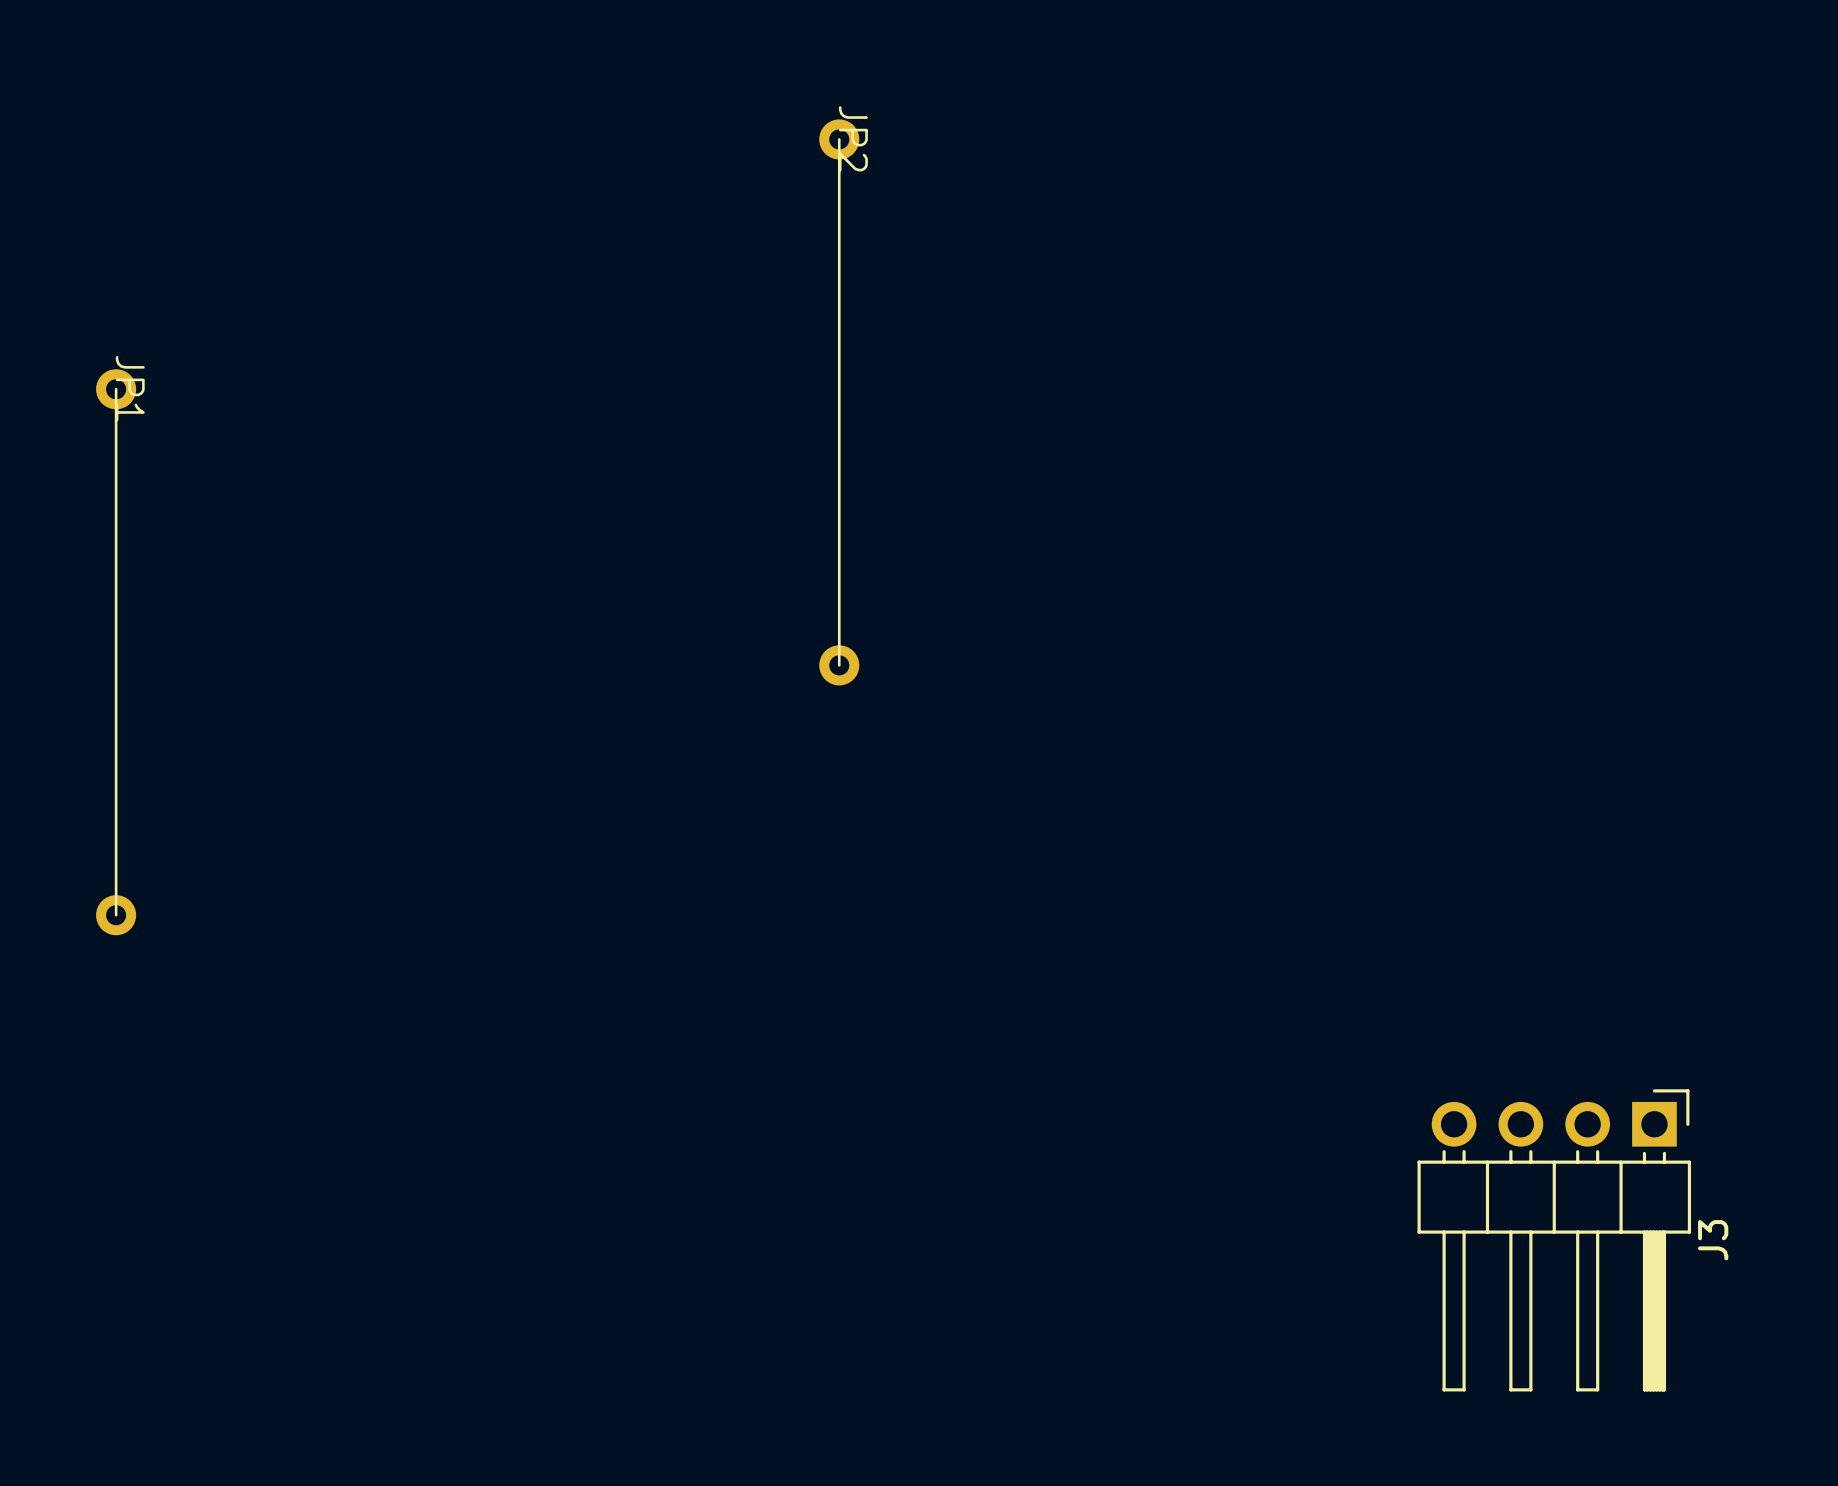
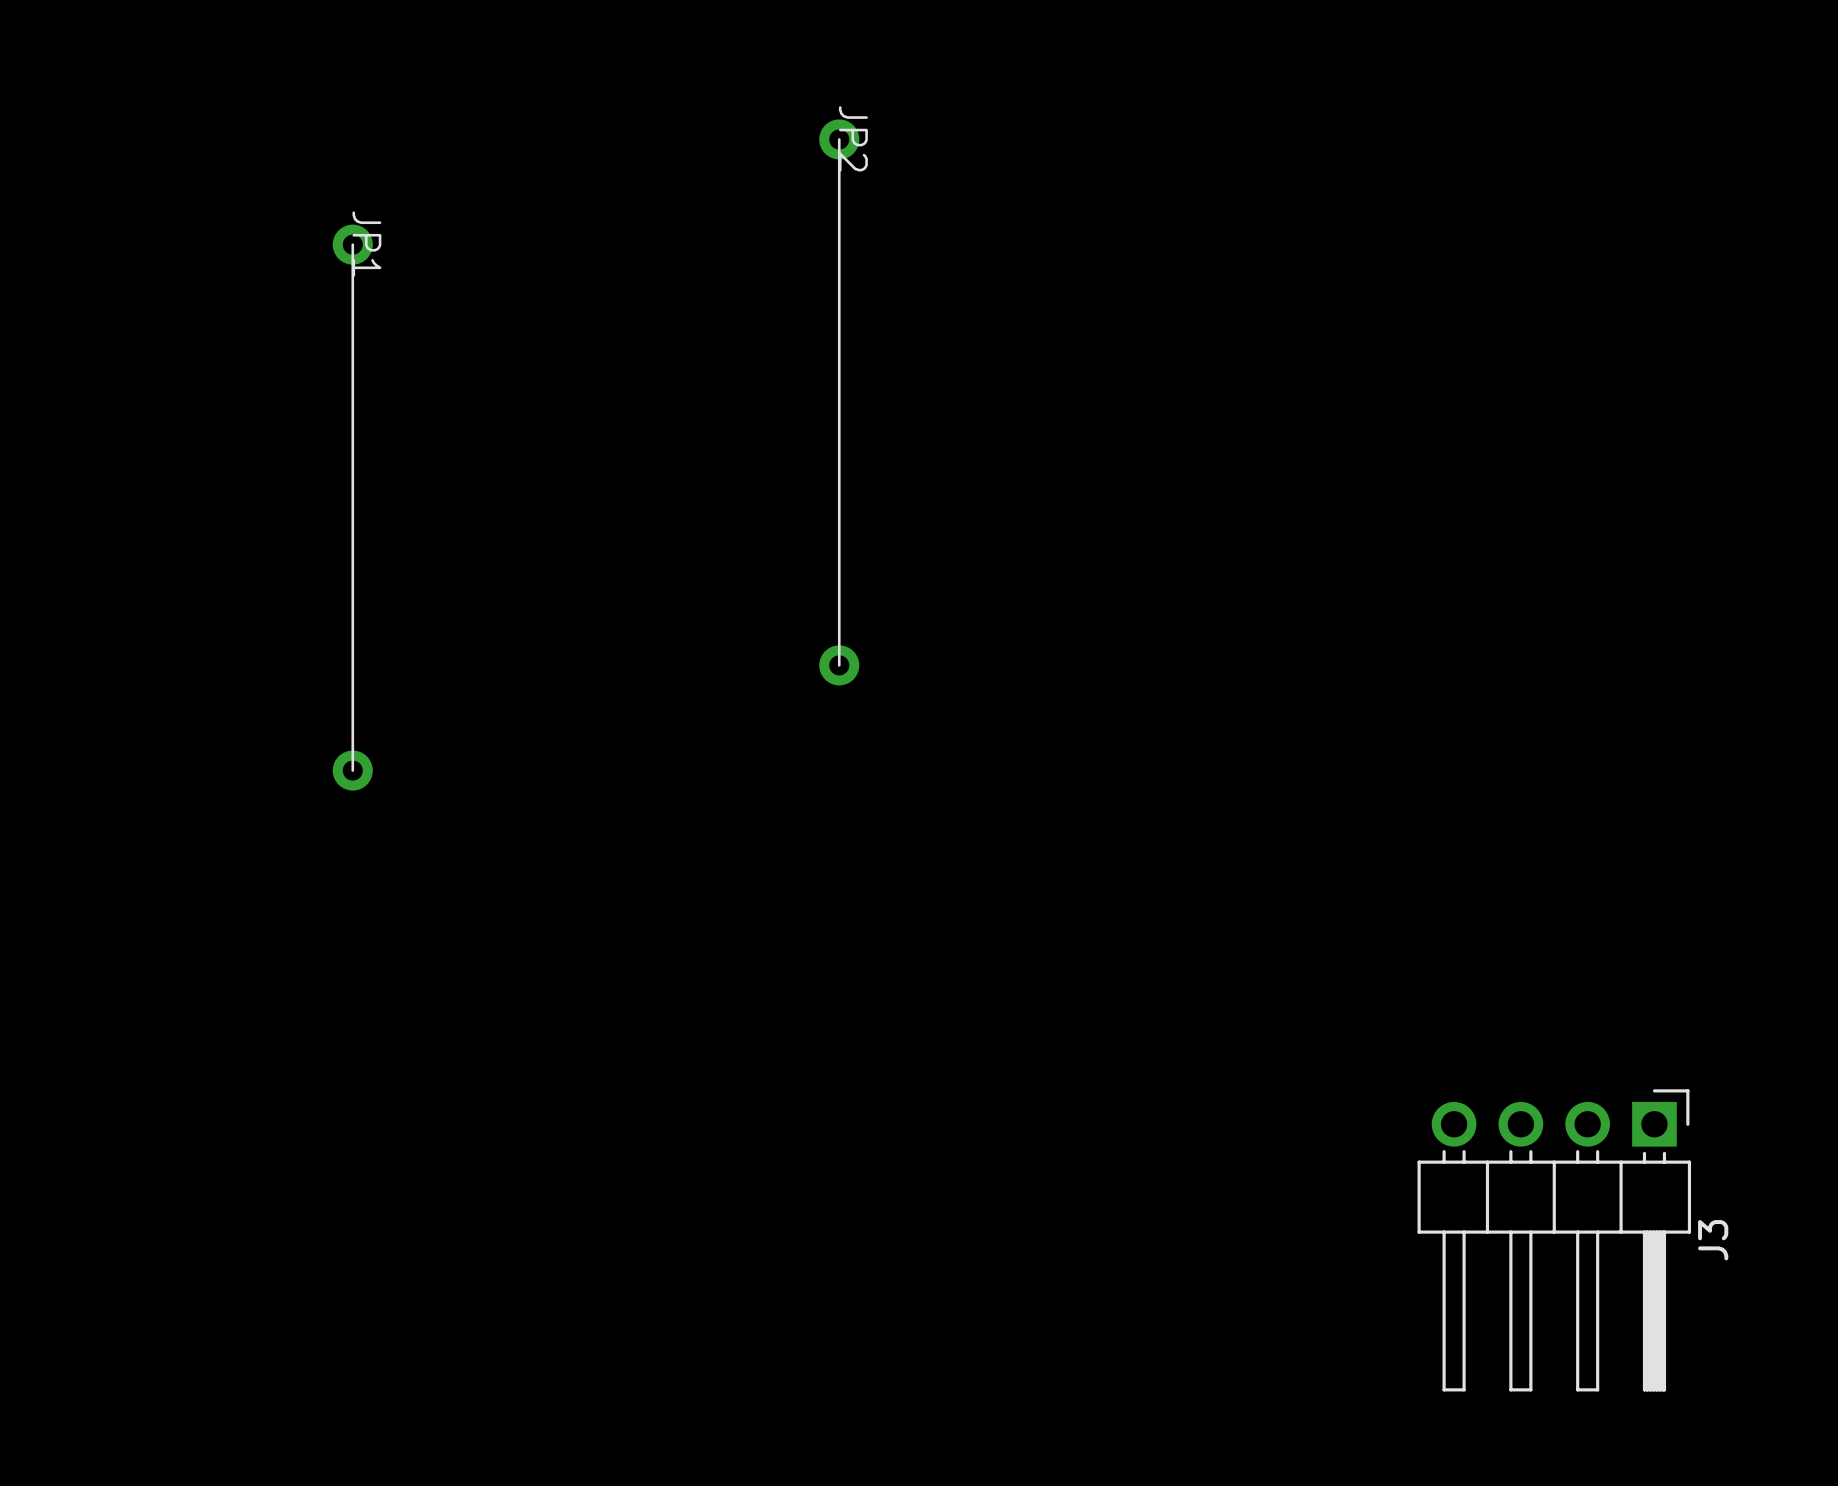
JP1 position: (116, 652) -> (352, 507)

